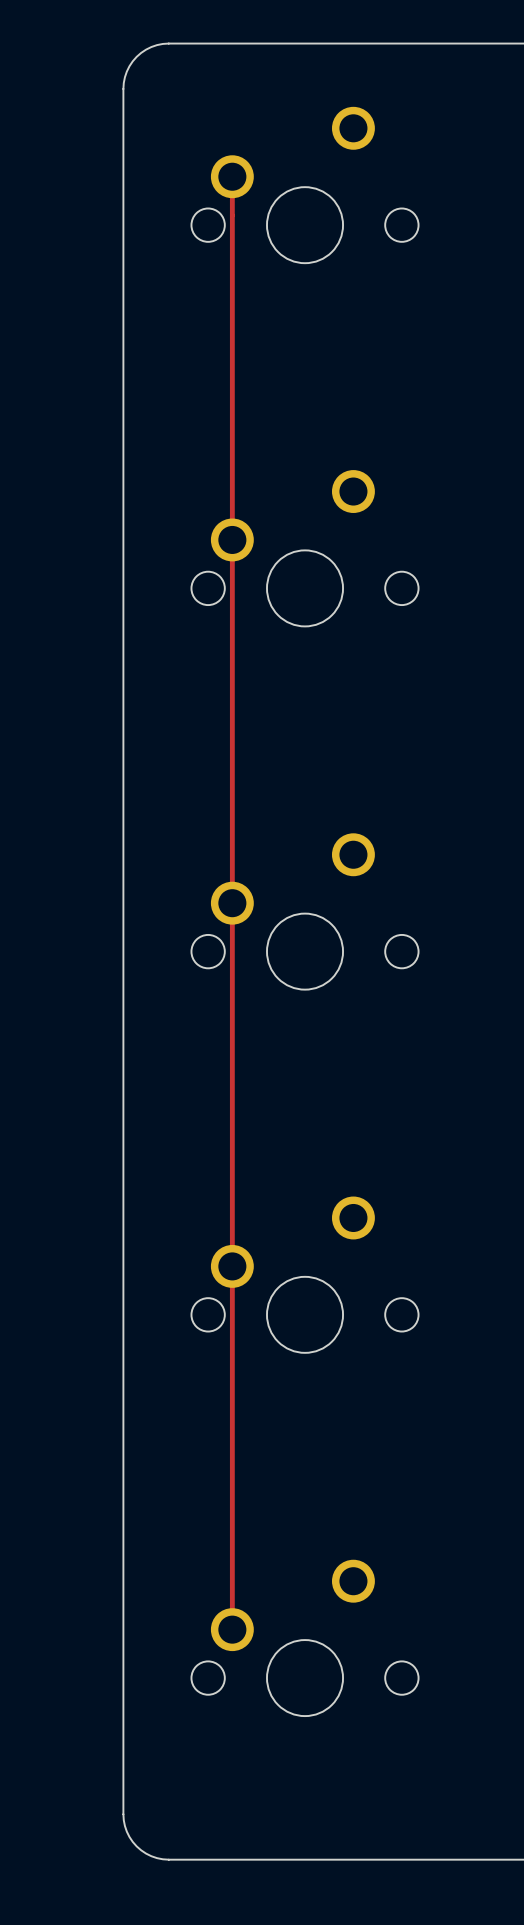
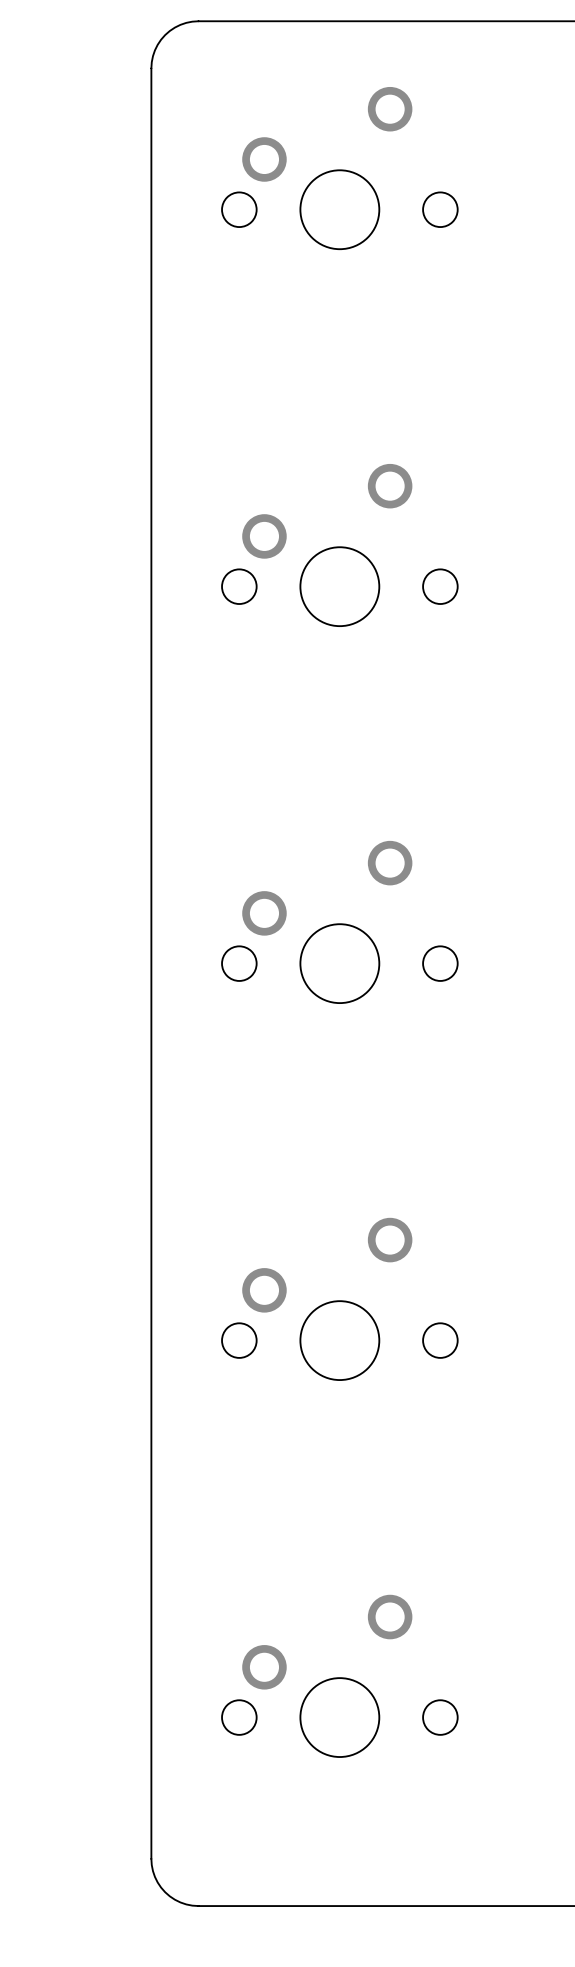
track: (232, 176) (232, 1629) -> none

